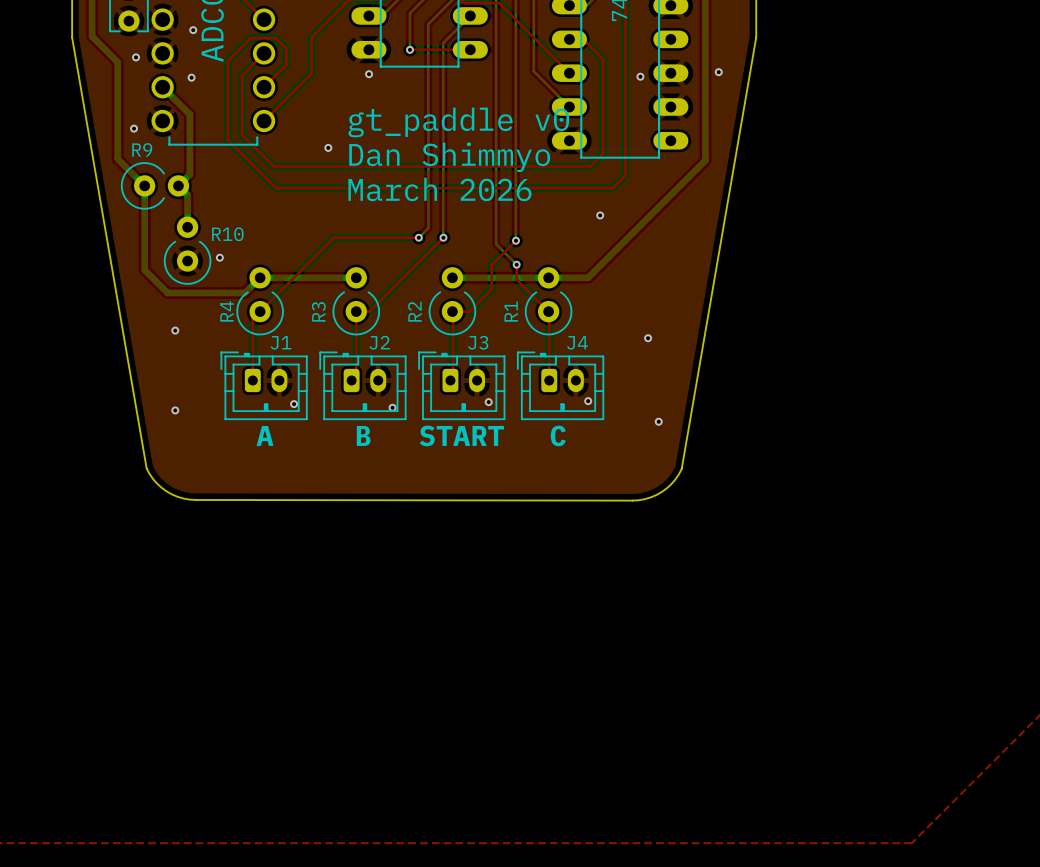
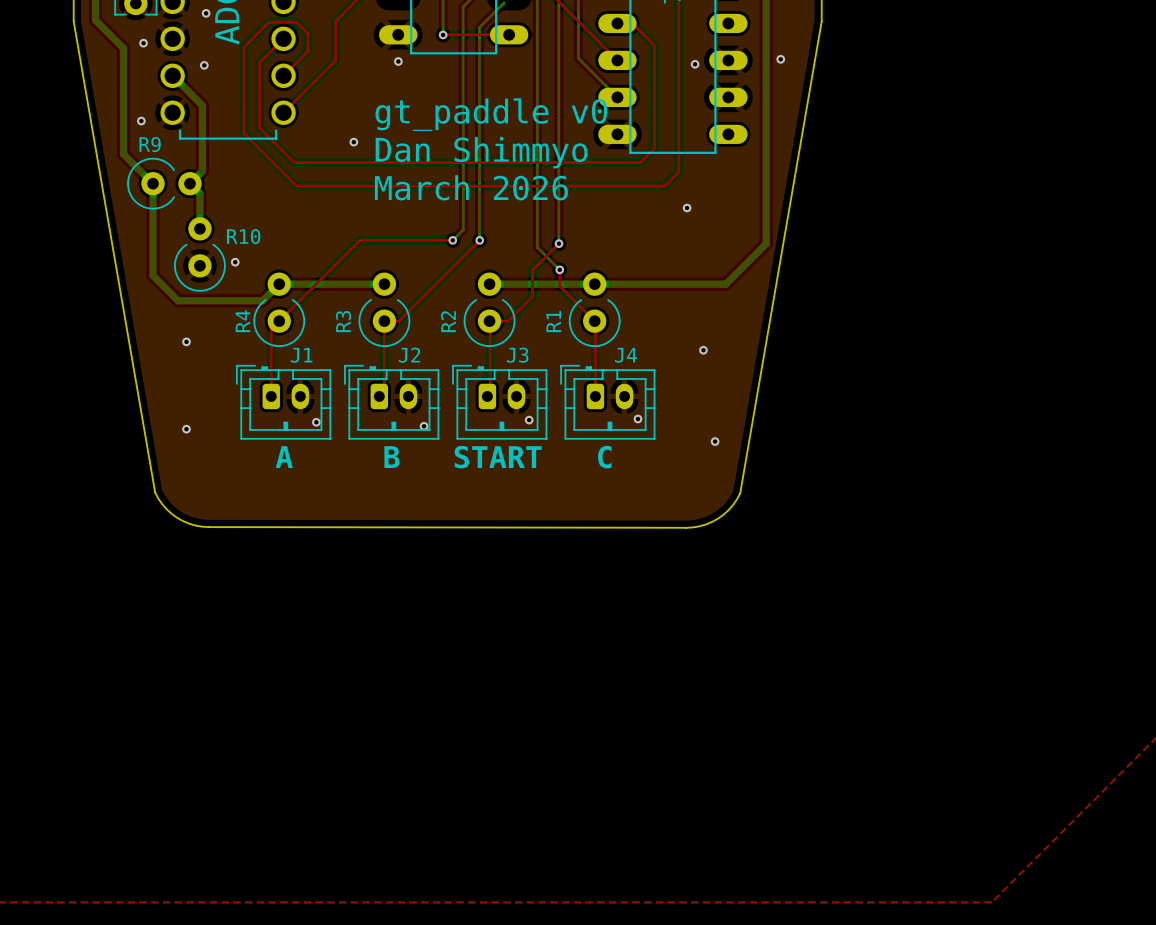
bottom track: (705, 160) (588, 277) -> (766, 155) (766, 243) (725, 284) (637, 284)
via position: (600, 215) -> (687, 207)

